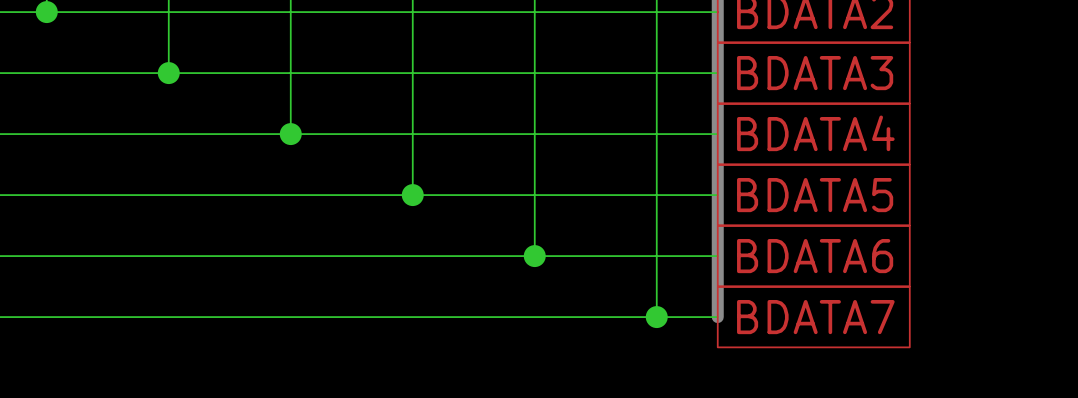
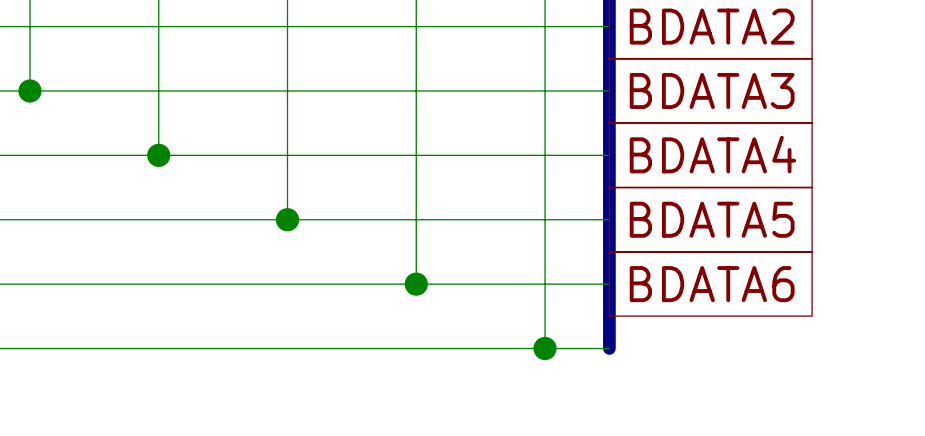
global label: BDATA7 (815, 317) -> none

